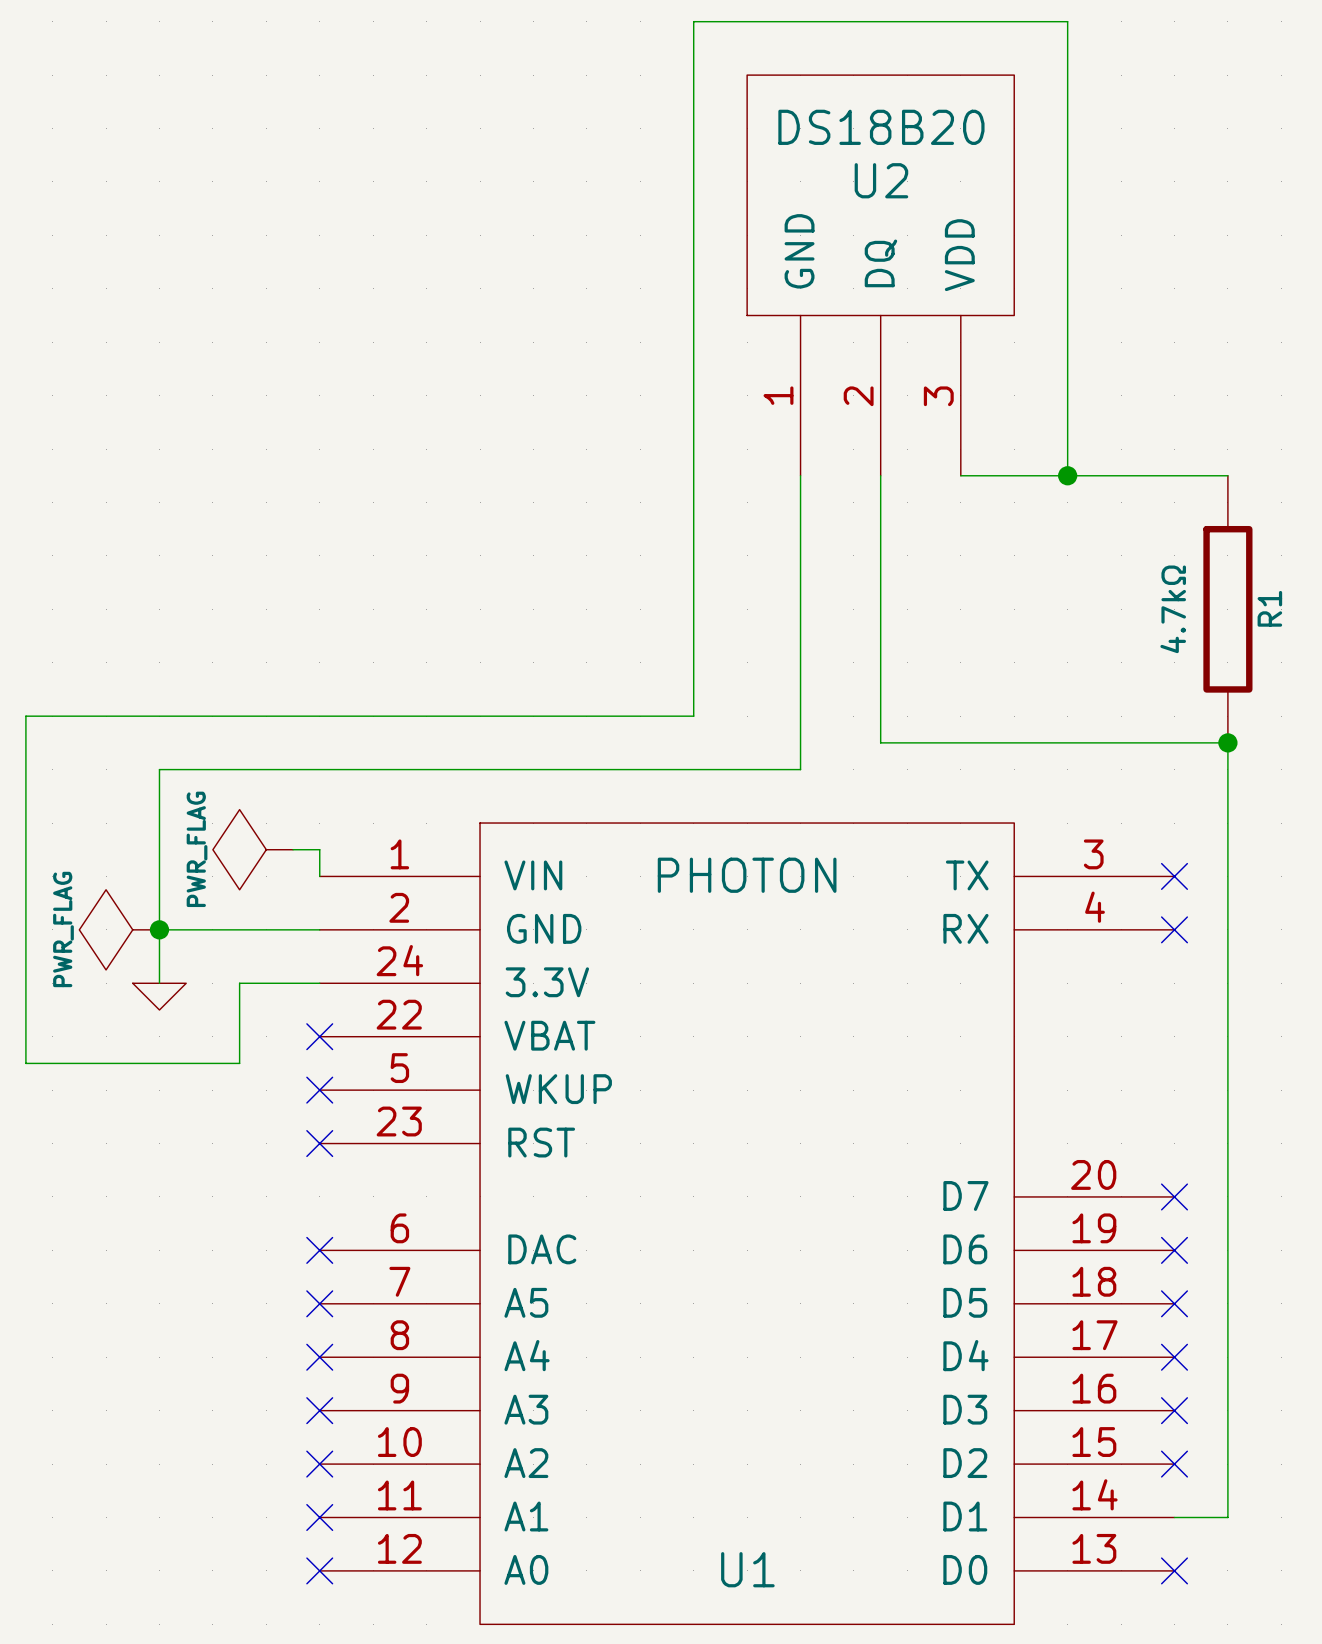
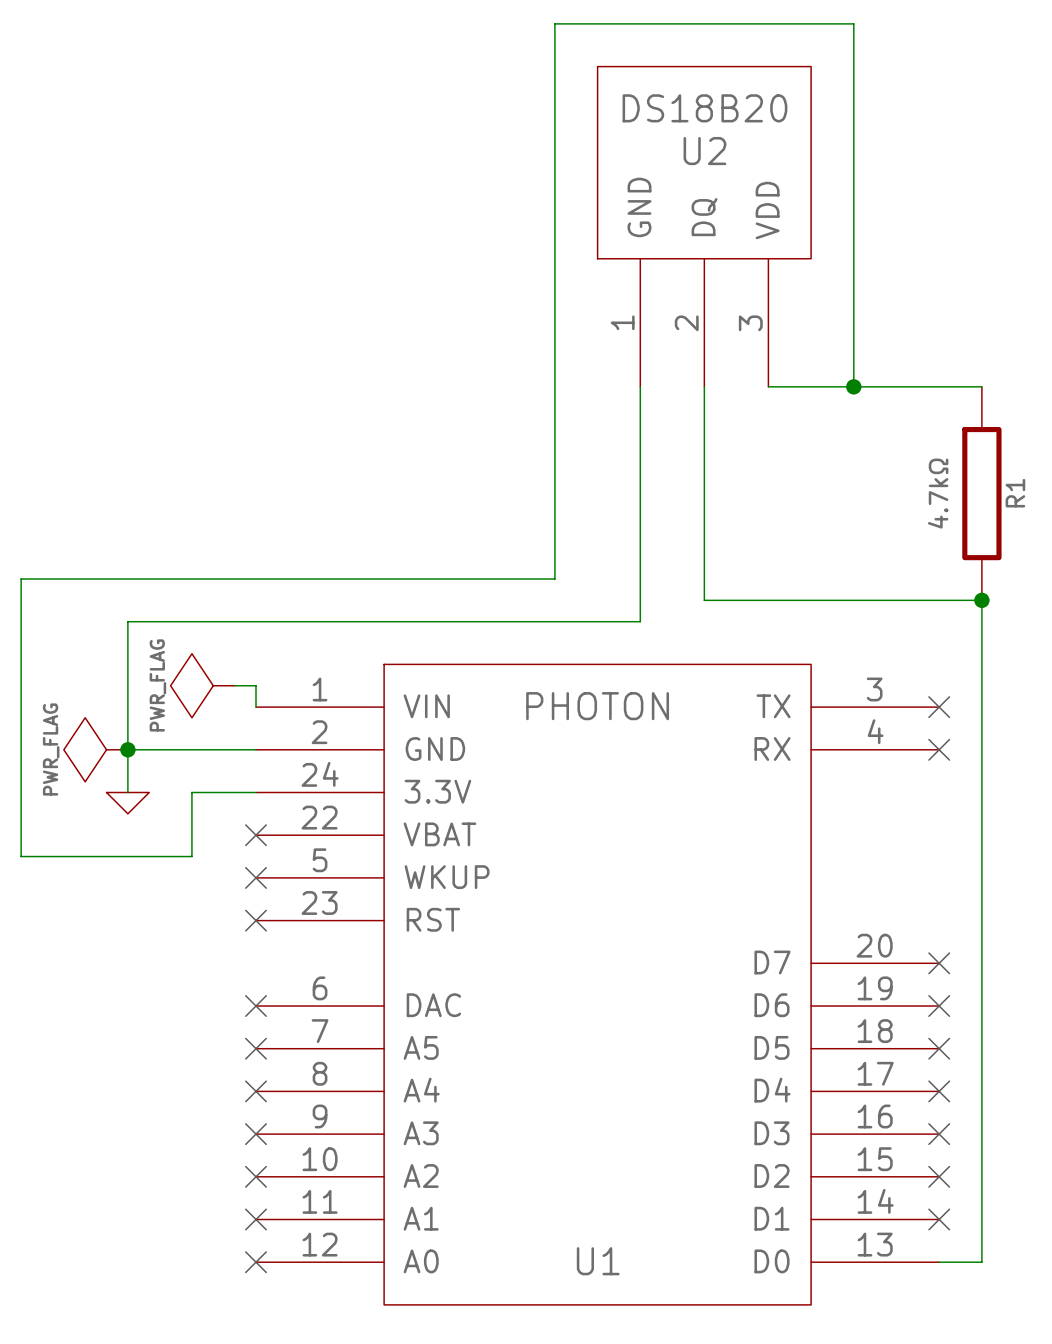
wire: (1174, 1517) (1227, 1517) -> (939, 1262) (981, 1262) (981, 1219)
no-connect mark position: (1174, 1570) -> (939, 1219)

